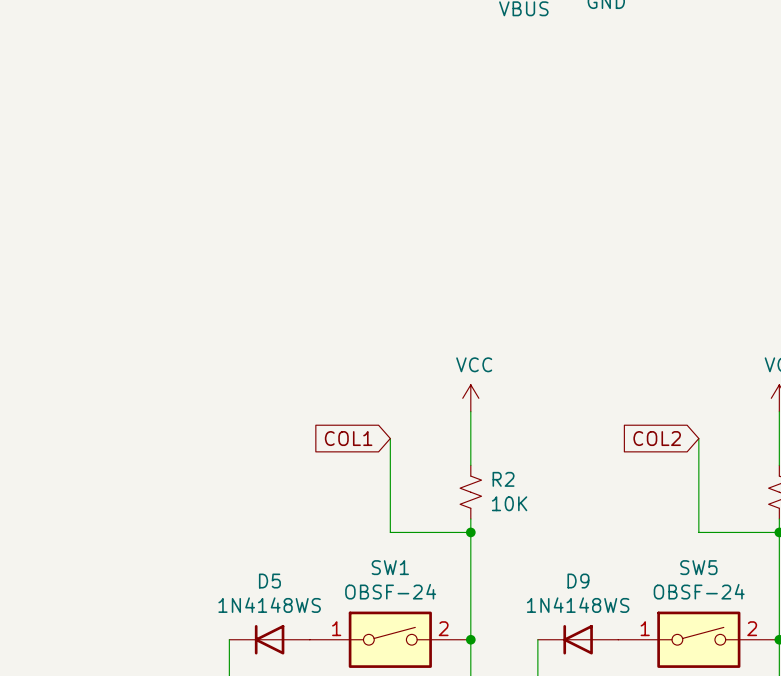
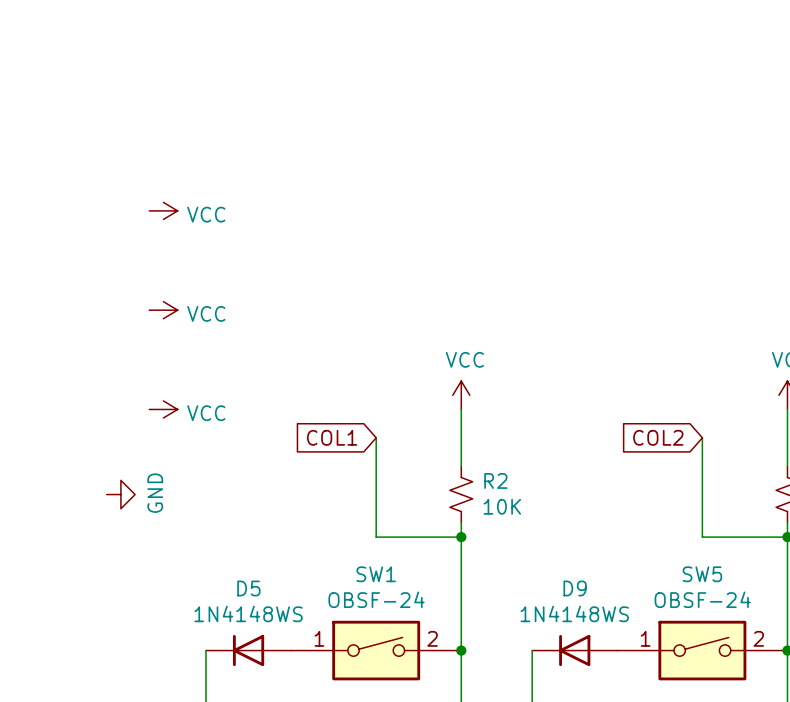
power symbol: none -> VCC (163, 210)
power symbol: none -> VCC (163, 310)
power symbol: none -> VCC (163, 409)
power symbol: none -> GND (120, 494)

